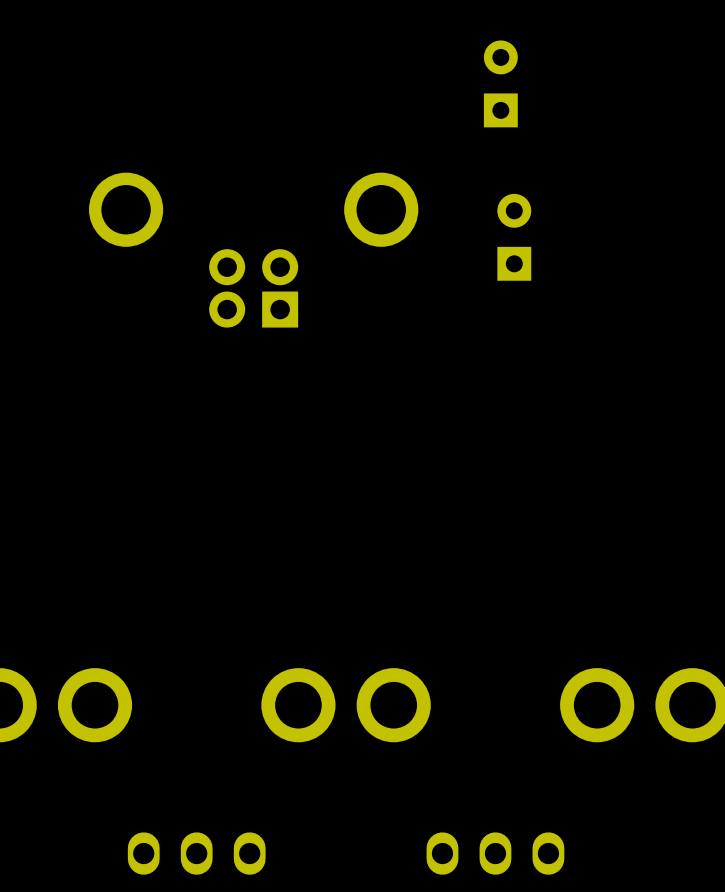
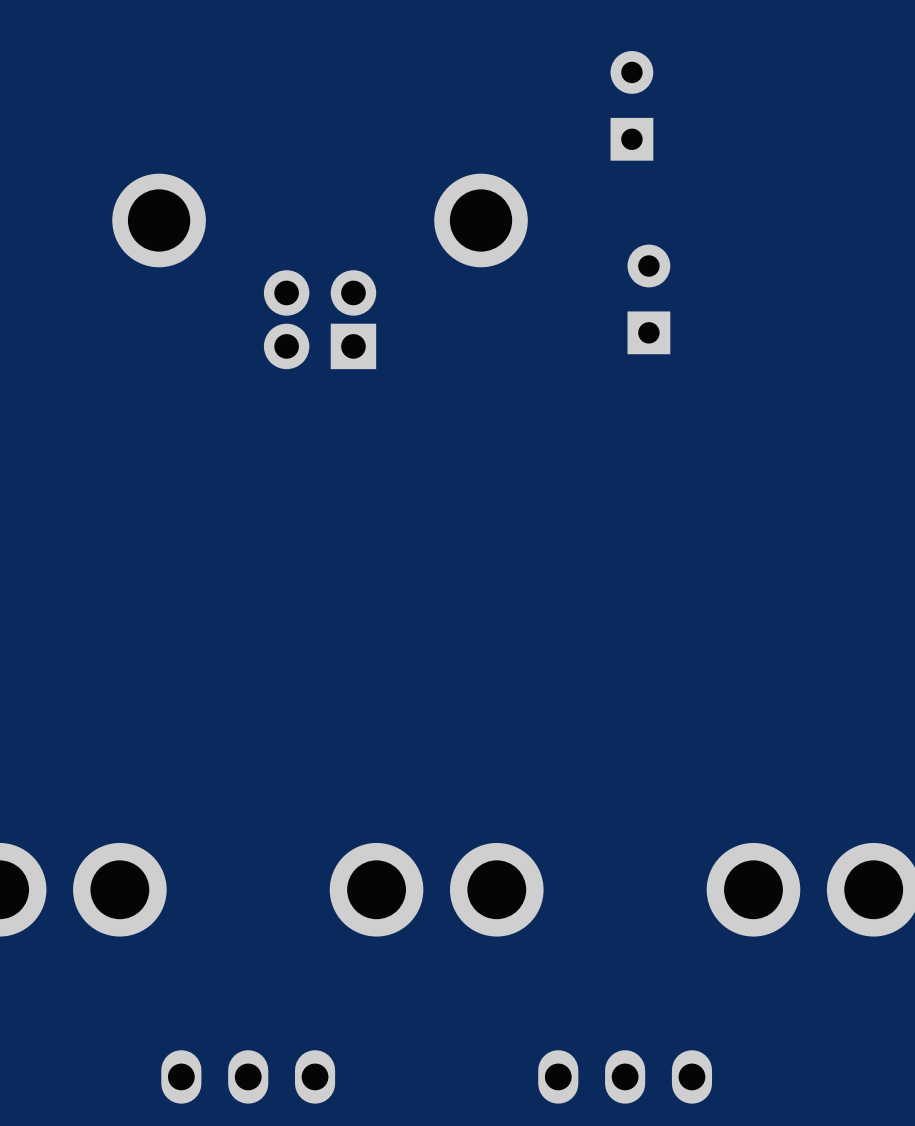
part position: (253, 250) -> (320, 271)

